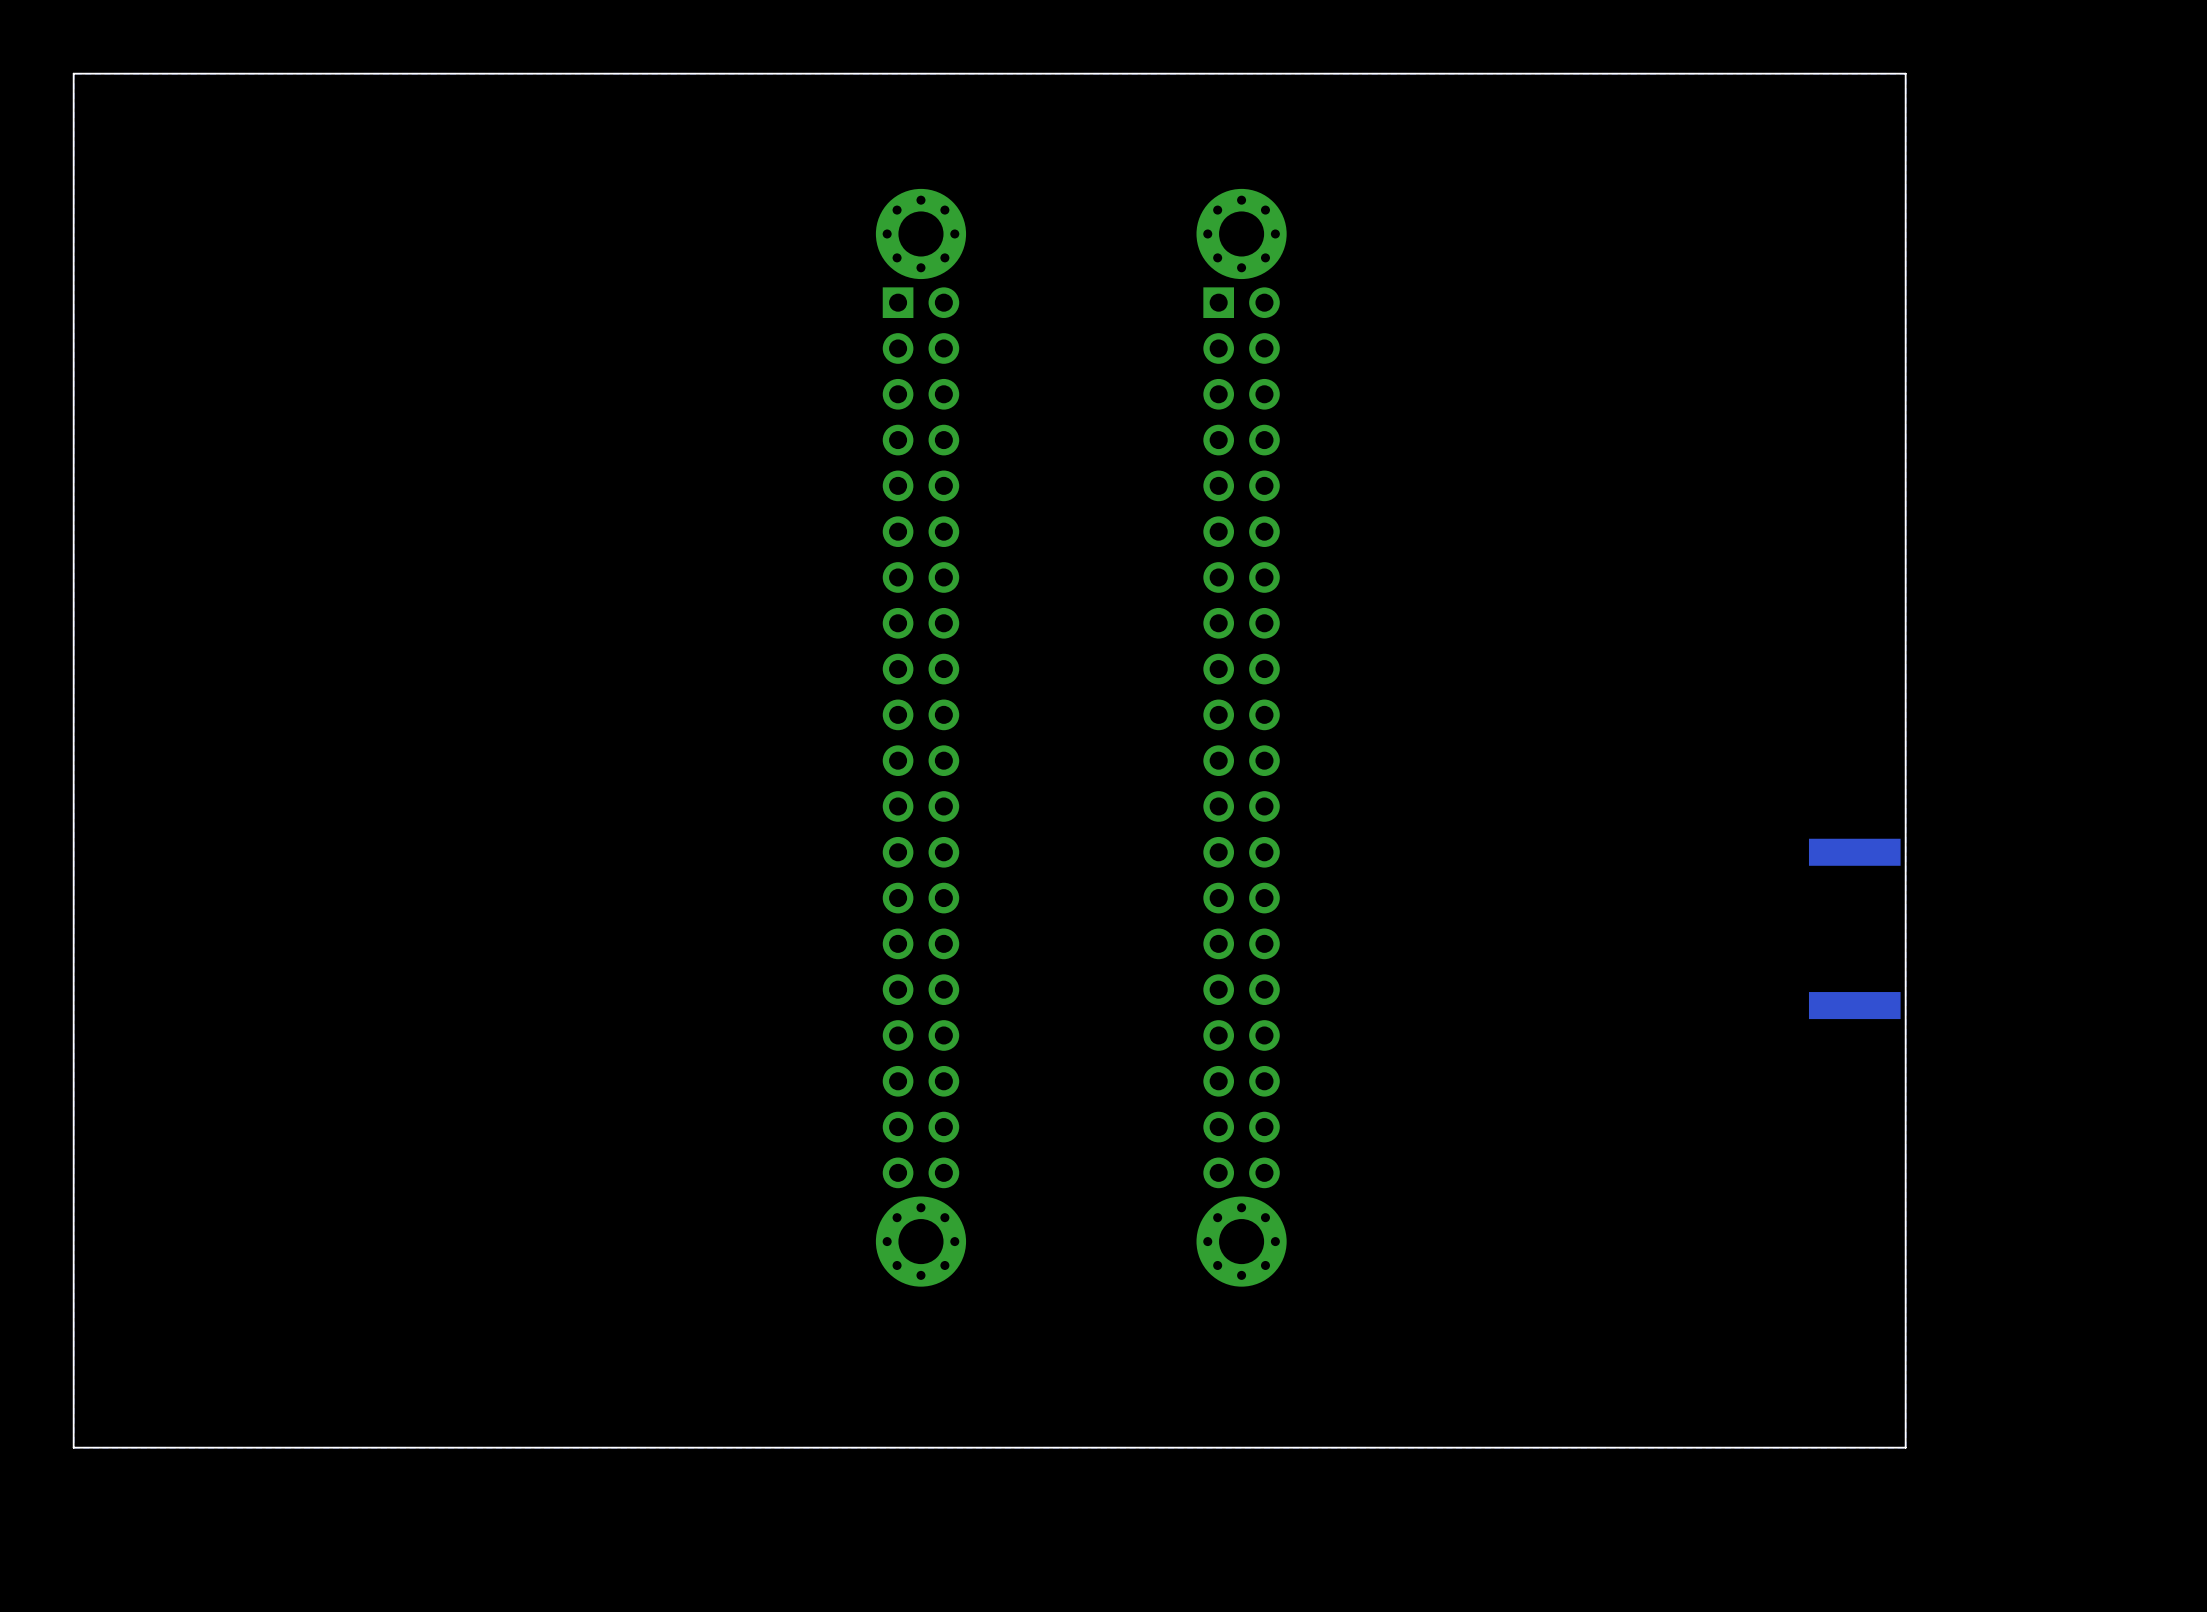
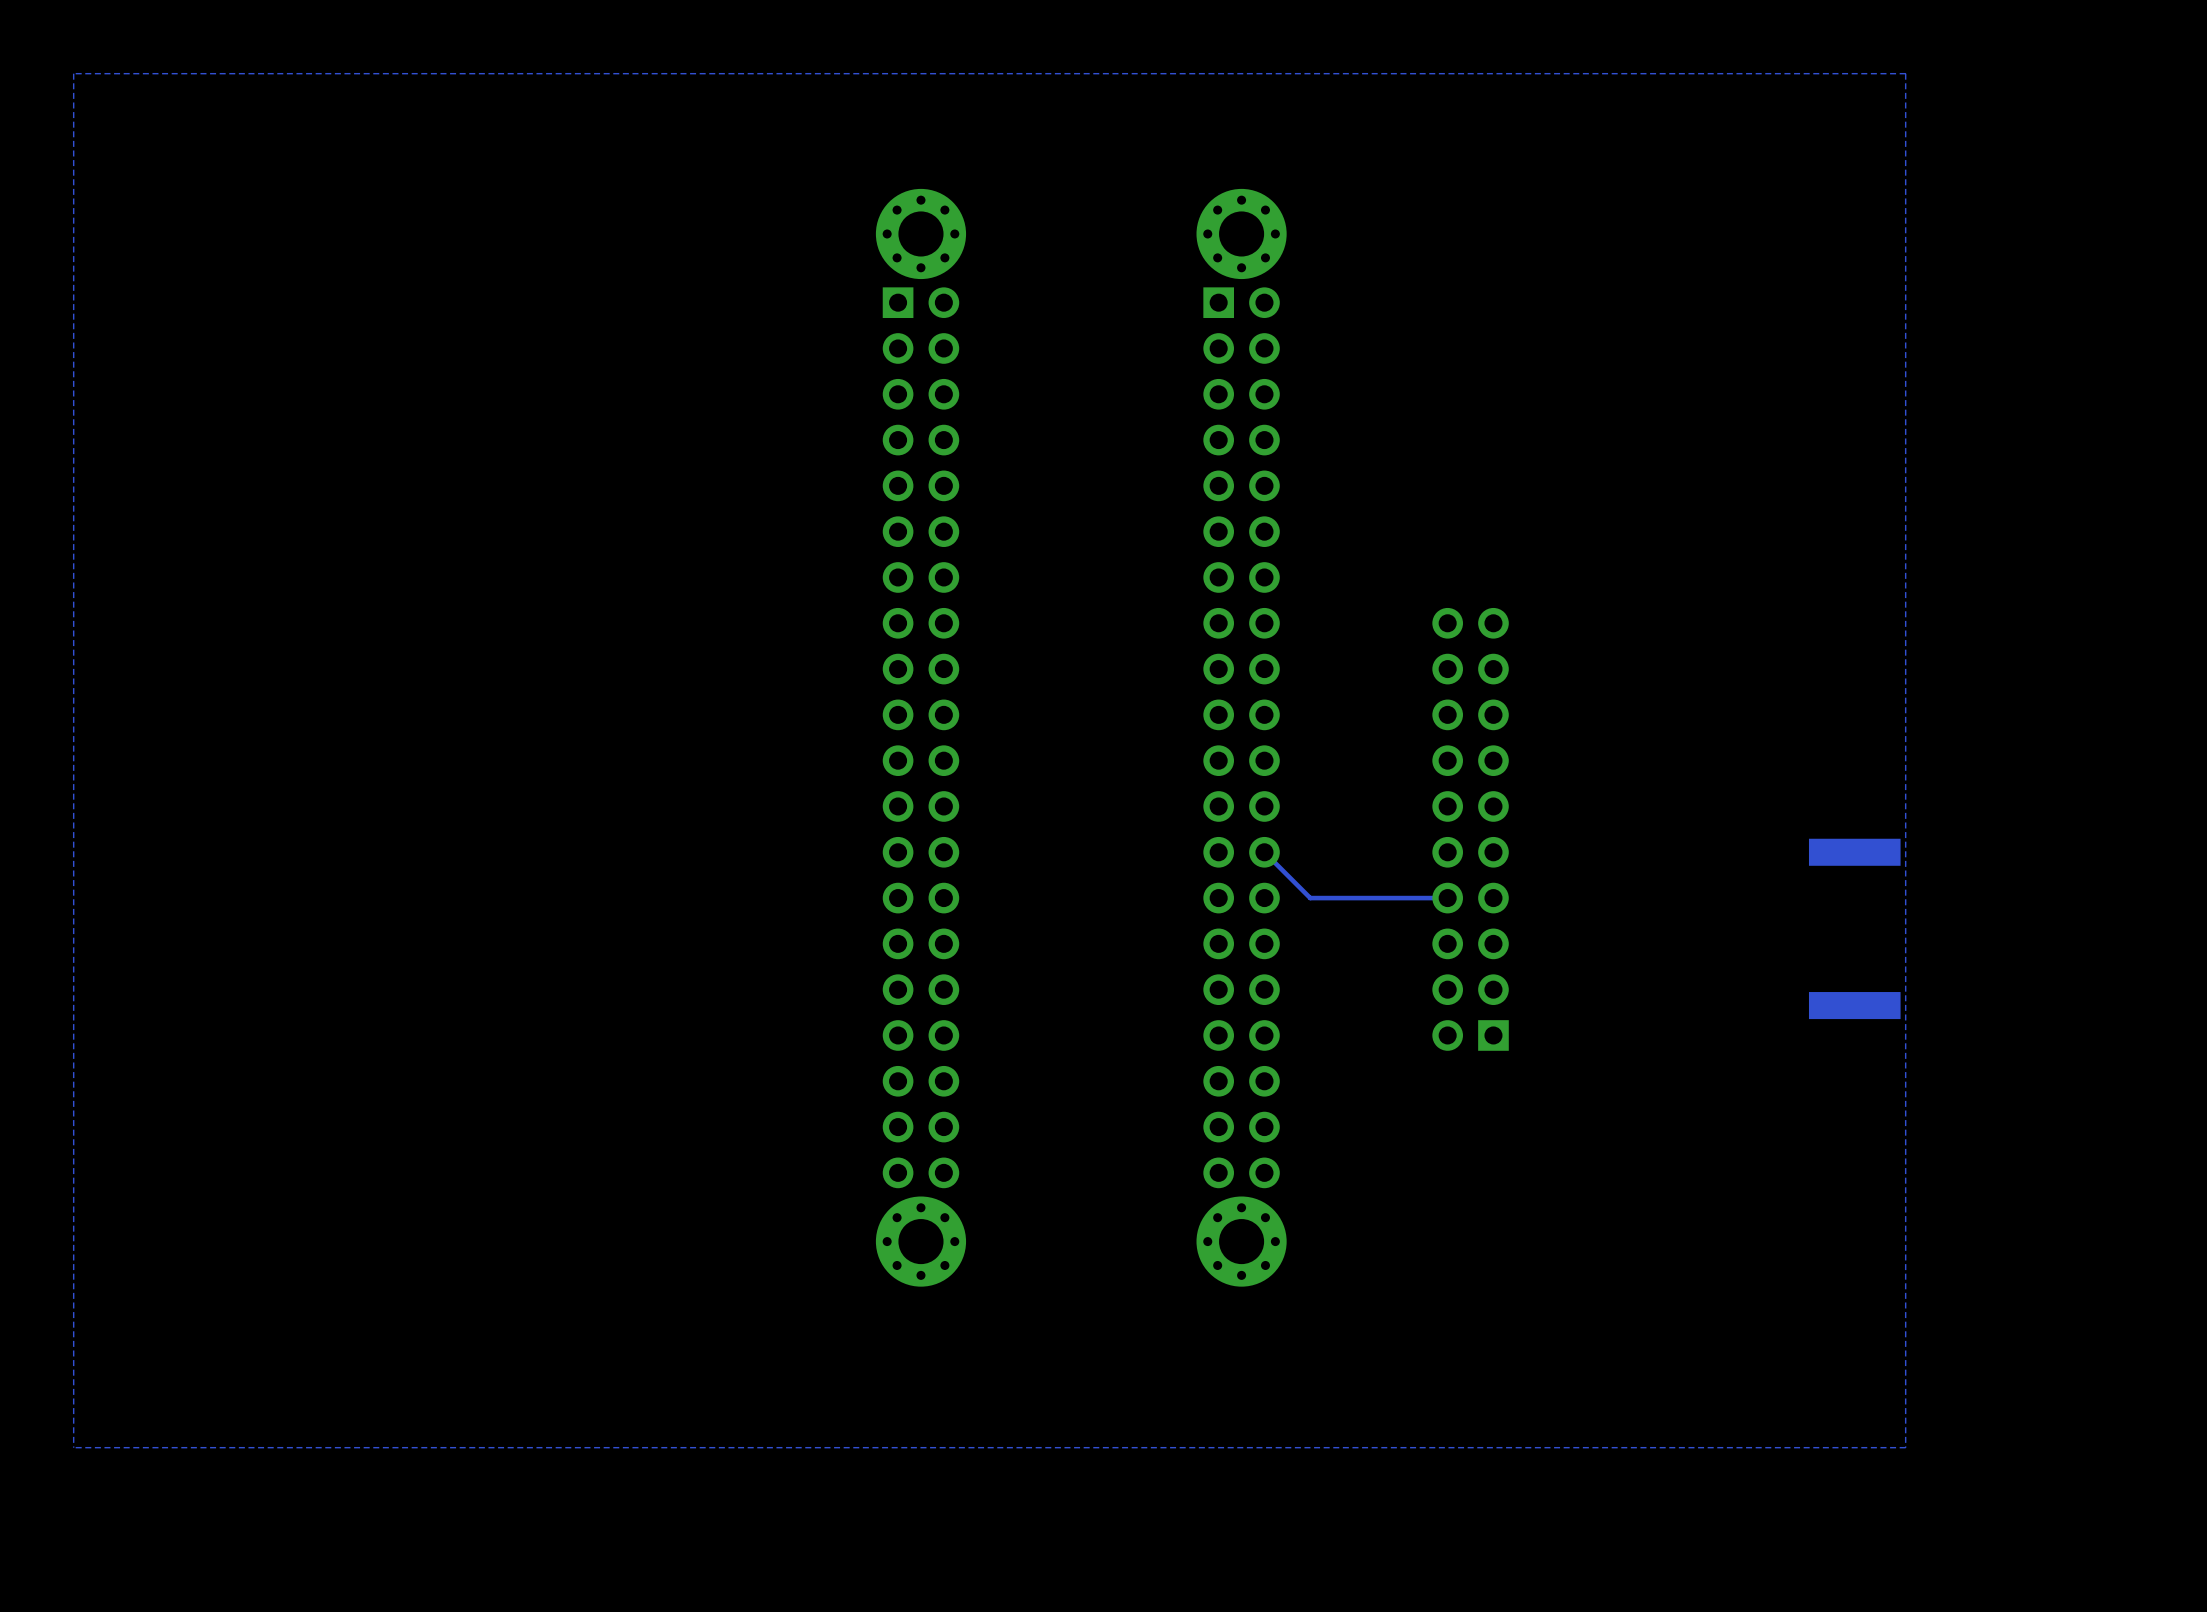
board edge: (1905, 73) (73, 73) (73, 1447) (1905, 1447) (1905, 73) -> none
part: none -> (1470, 829)
track: none -> (1264, 852) (1310, 898) (1447, 898)

